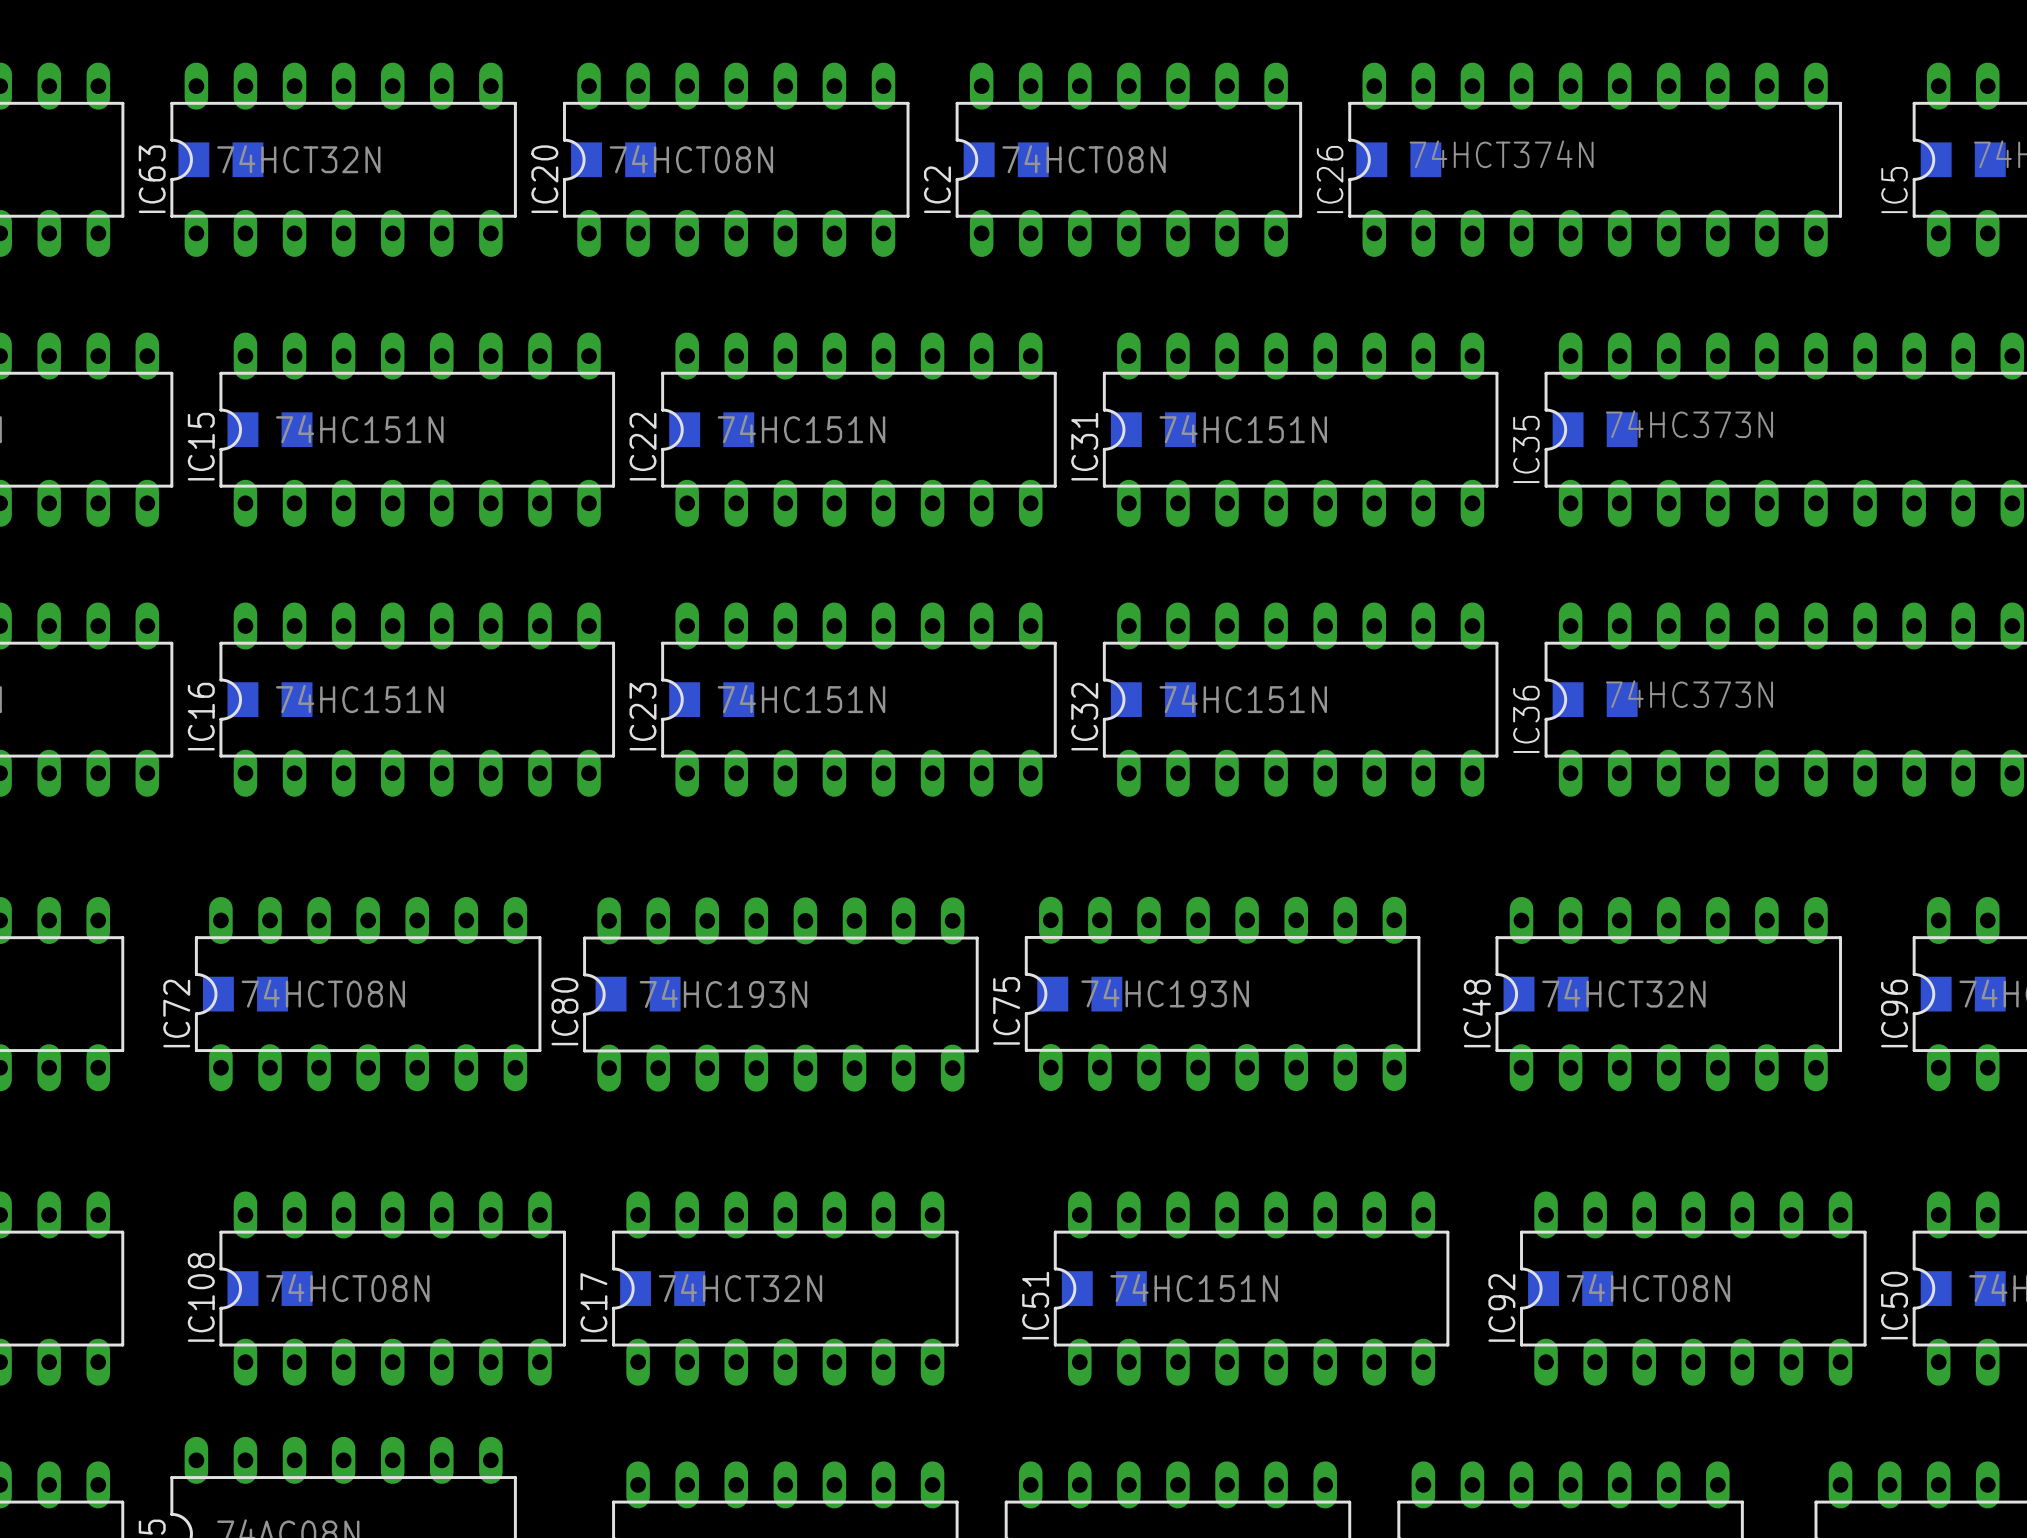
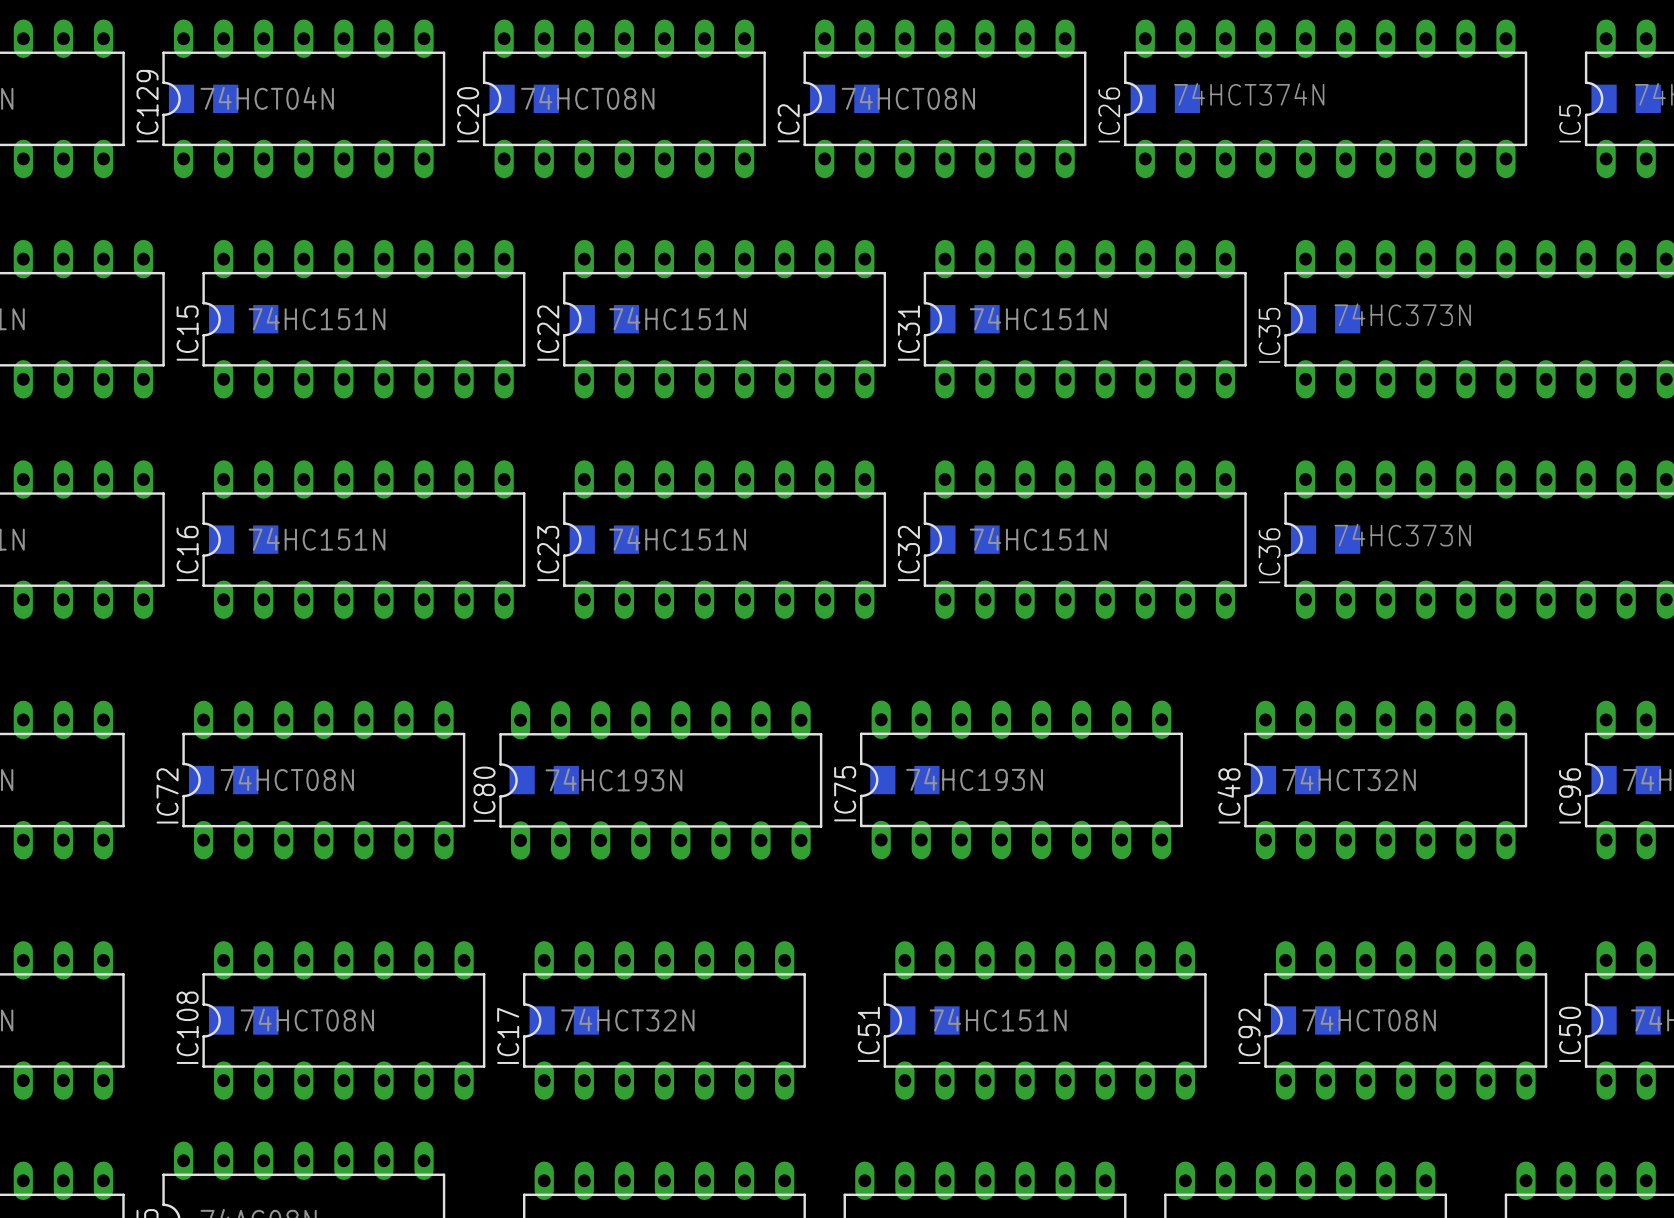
IC63 value: 74HCT32N (298, 159) -> 74HCT04N (267, 98)
IC63 name: IC63 (152, 179) -> IC129 (147, 106)

